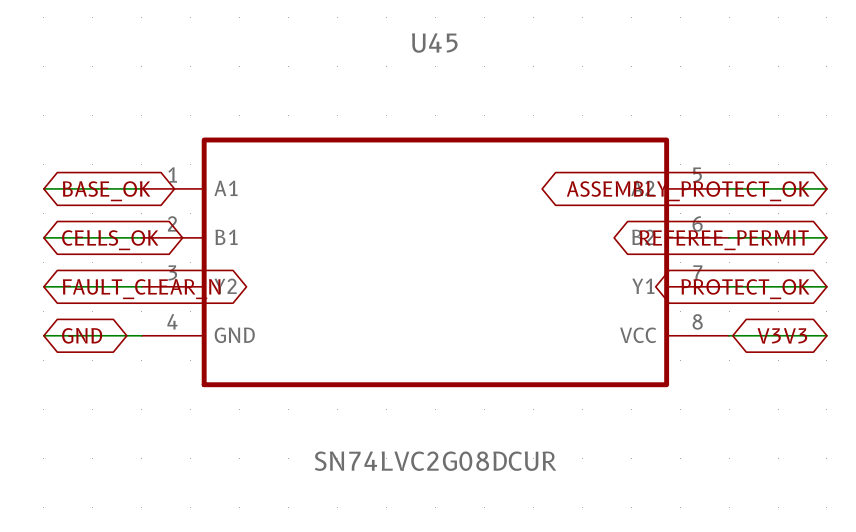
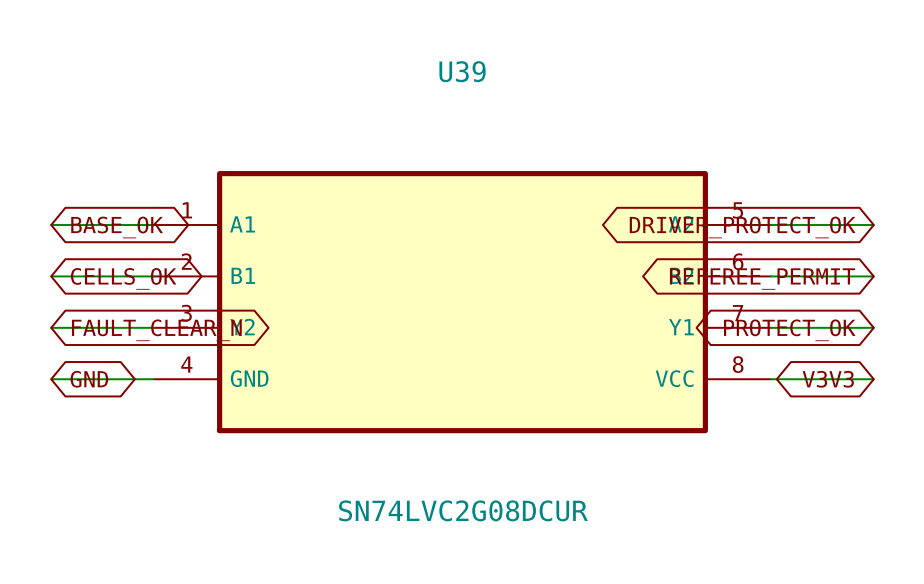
U45 name: U45 (434, 43) -> U39 (462, 71)
global label: ASSEMBLY_PROTECT_OK (688, 191) -> DRIVER_PROTECT_OK (742, 227)

